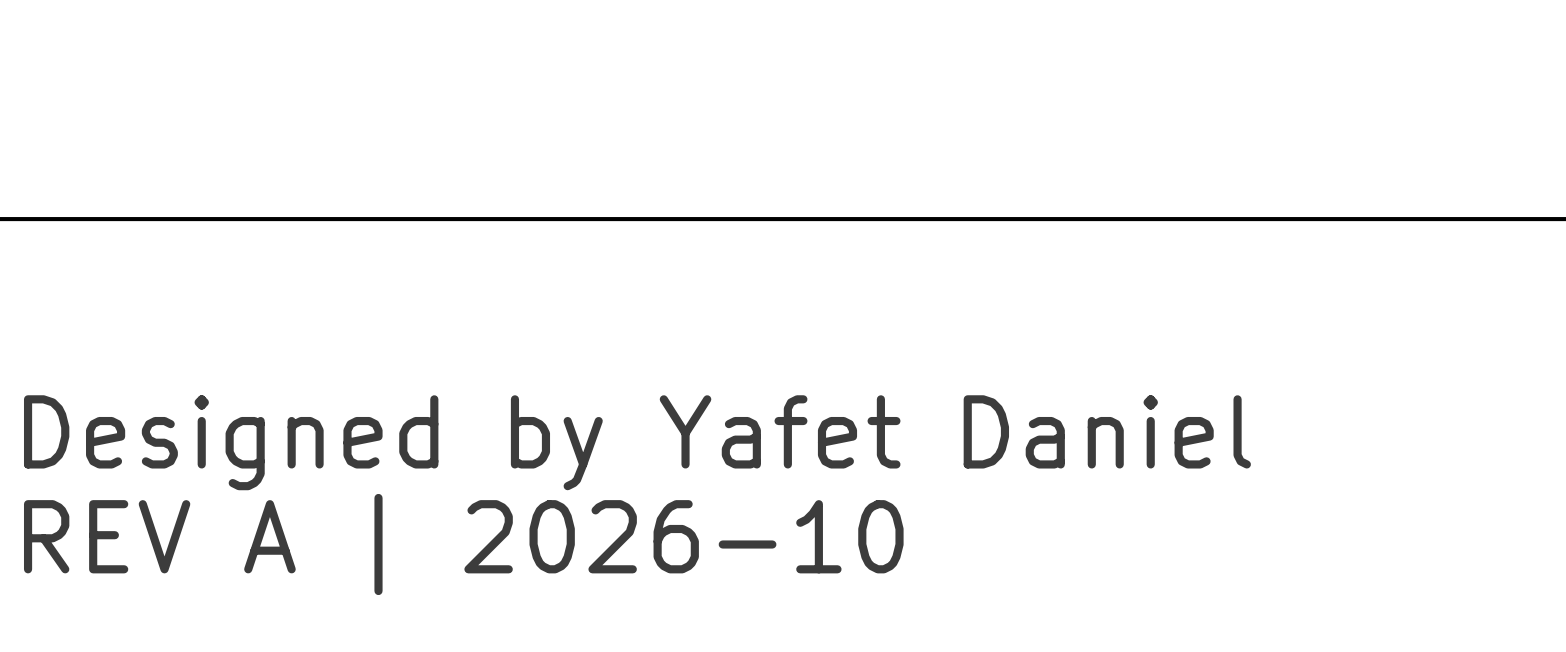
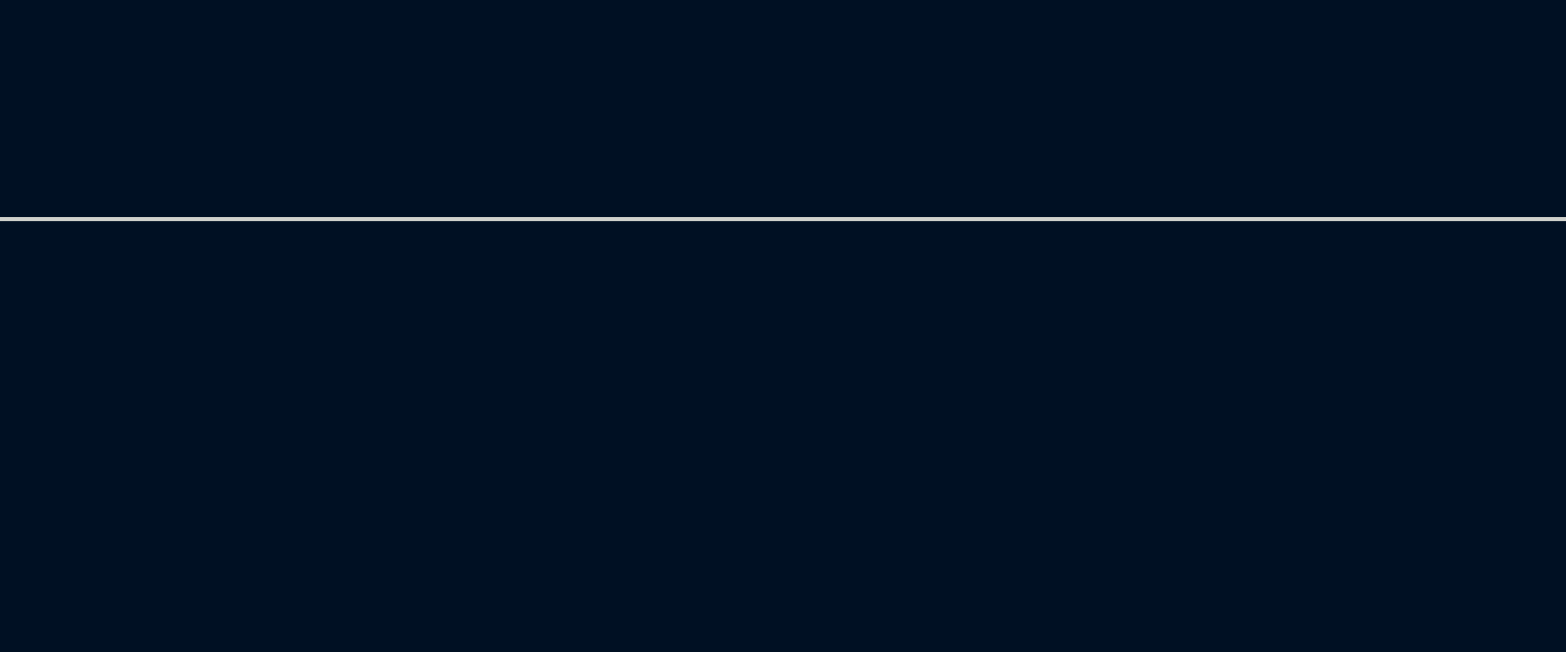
text: Designed by Yafet Daniel (637, 442) -> none
text: REV A | 2026-10 (463, 544) -> none

